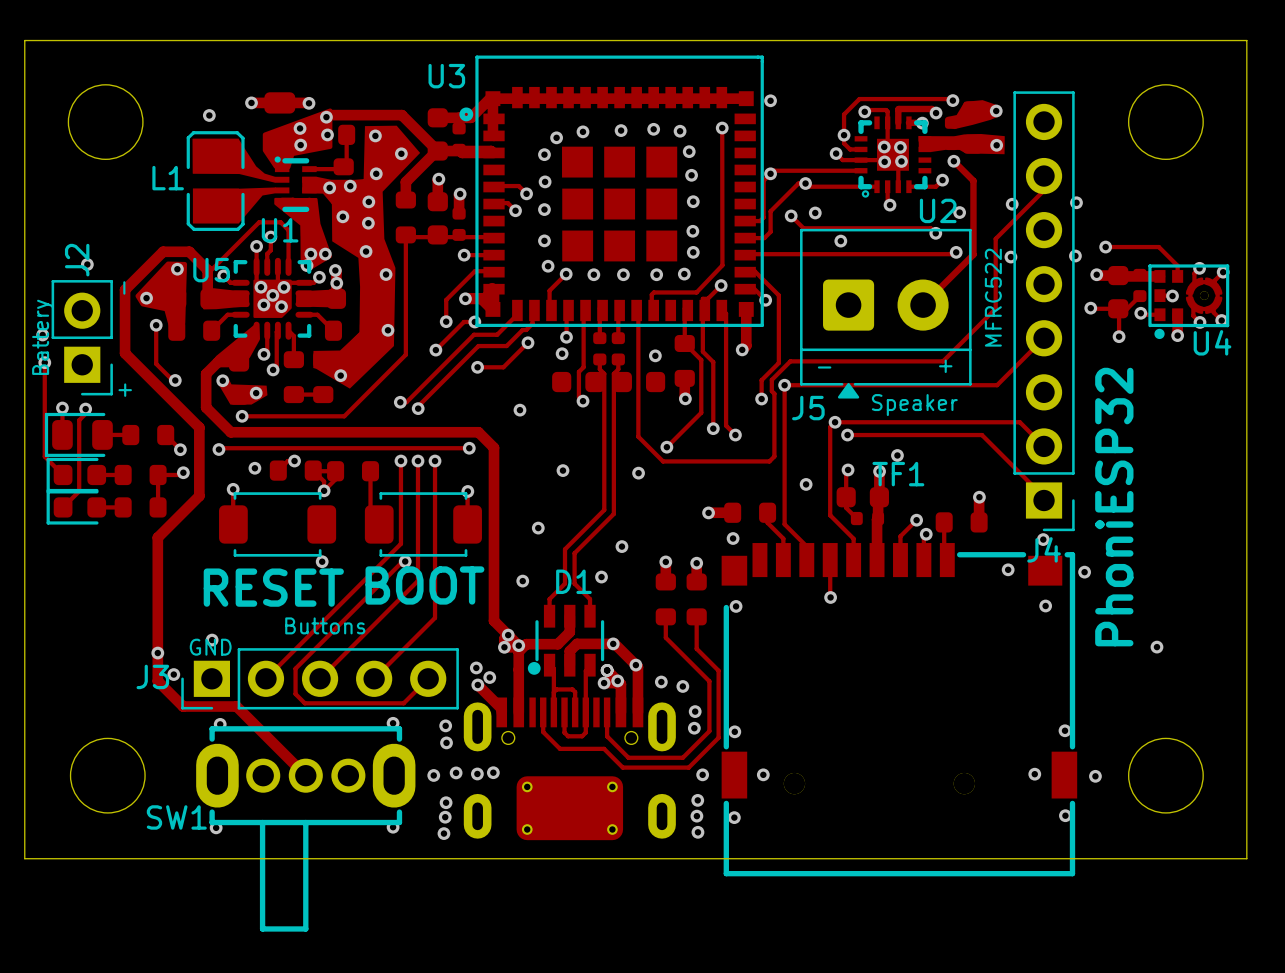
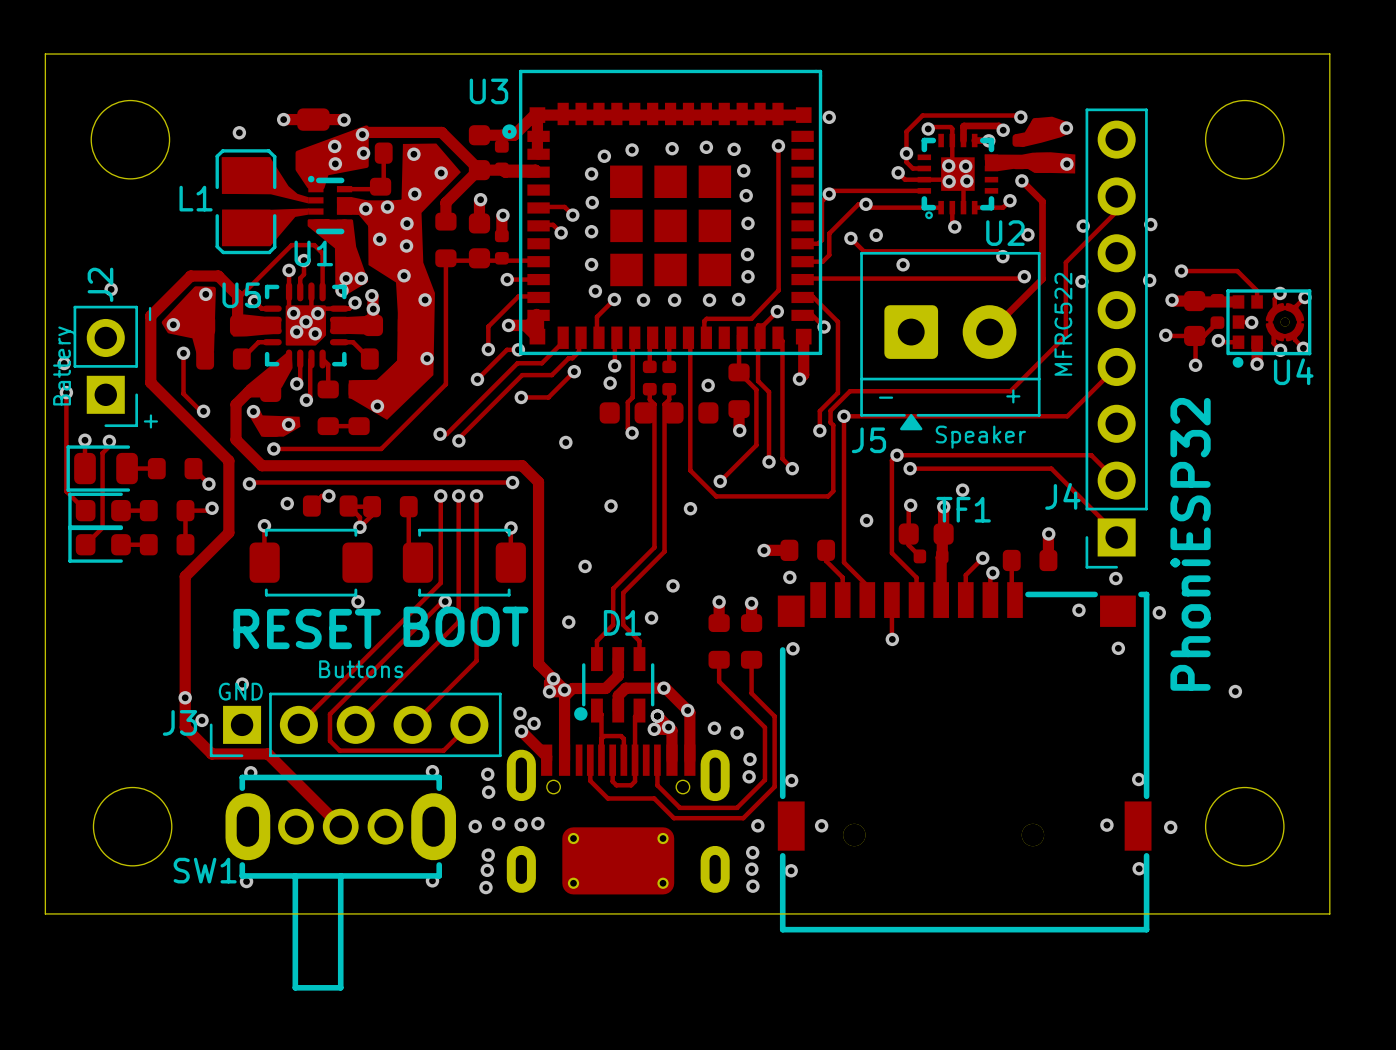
J4 footprint: [1013, 91, 1075, 532] -> [1085, 108, 1148, 569]
J4 name position: J4 (1044, 549) -> J4 (1062, 496)

